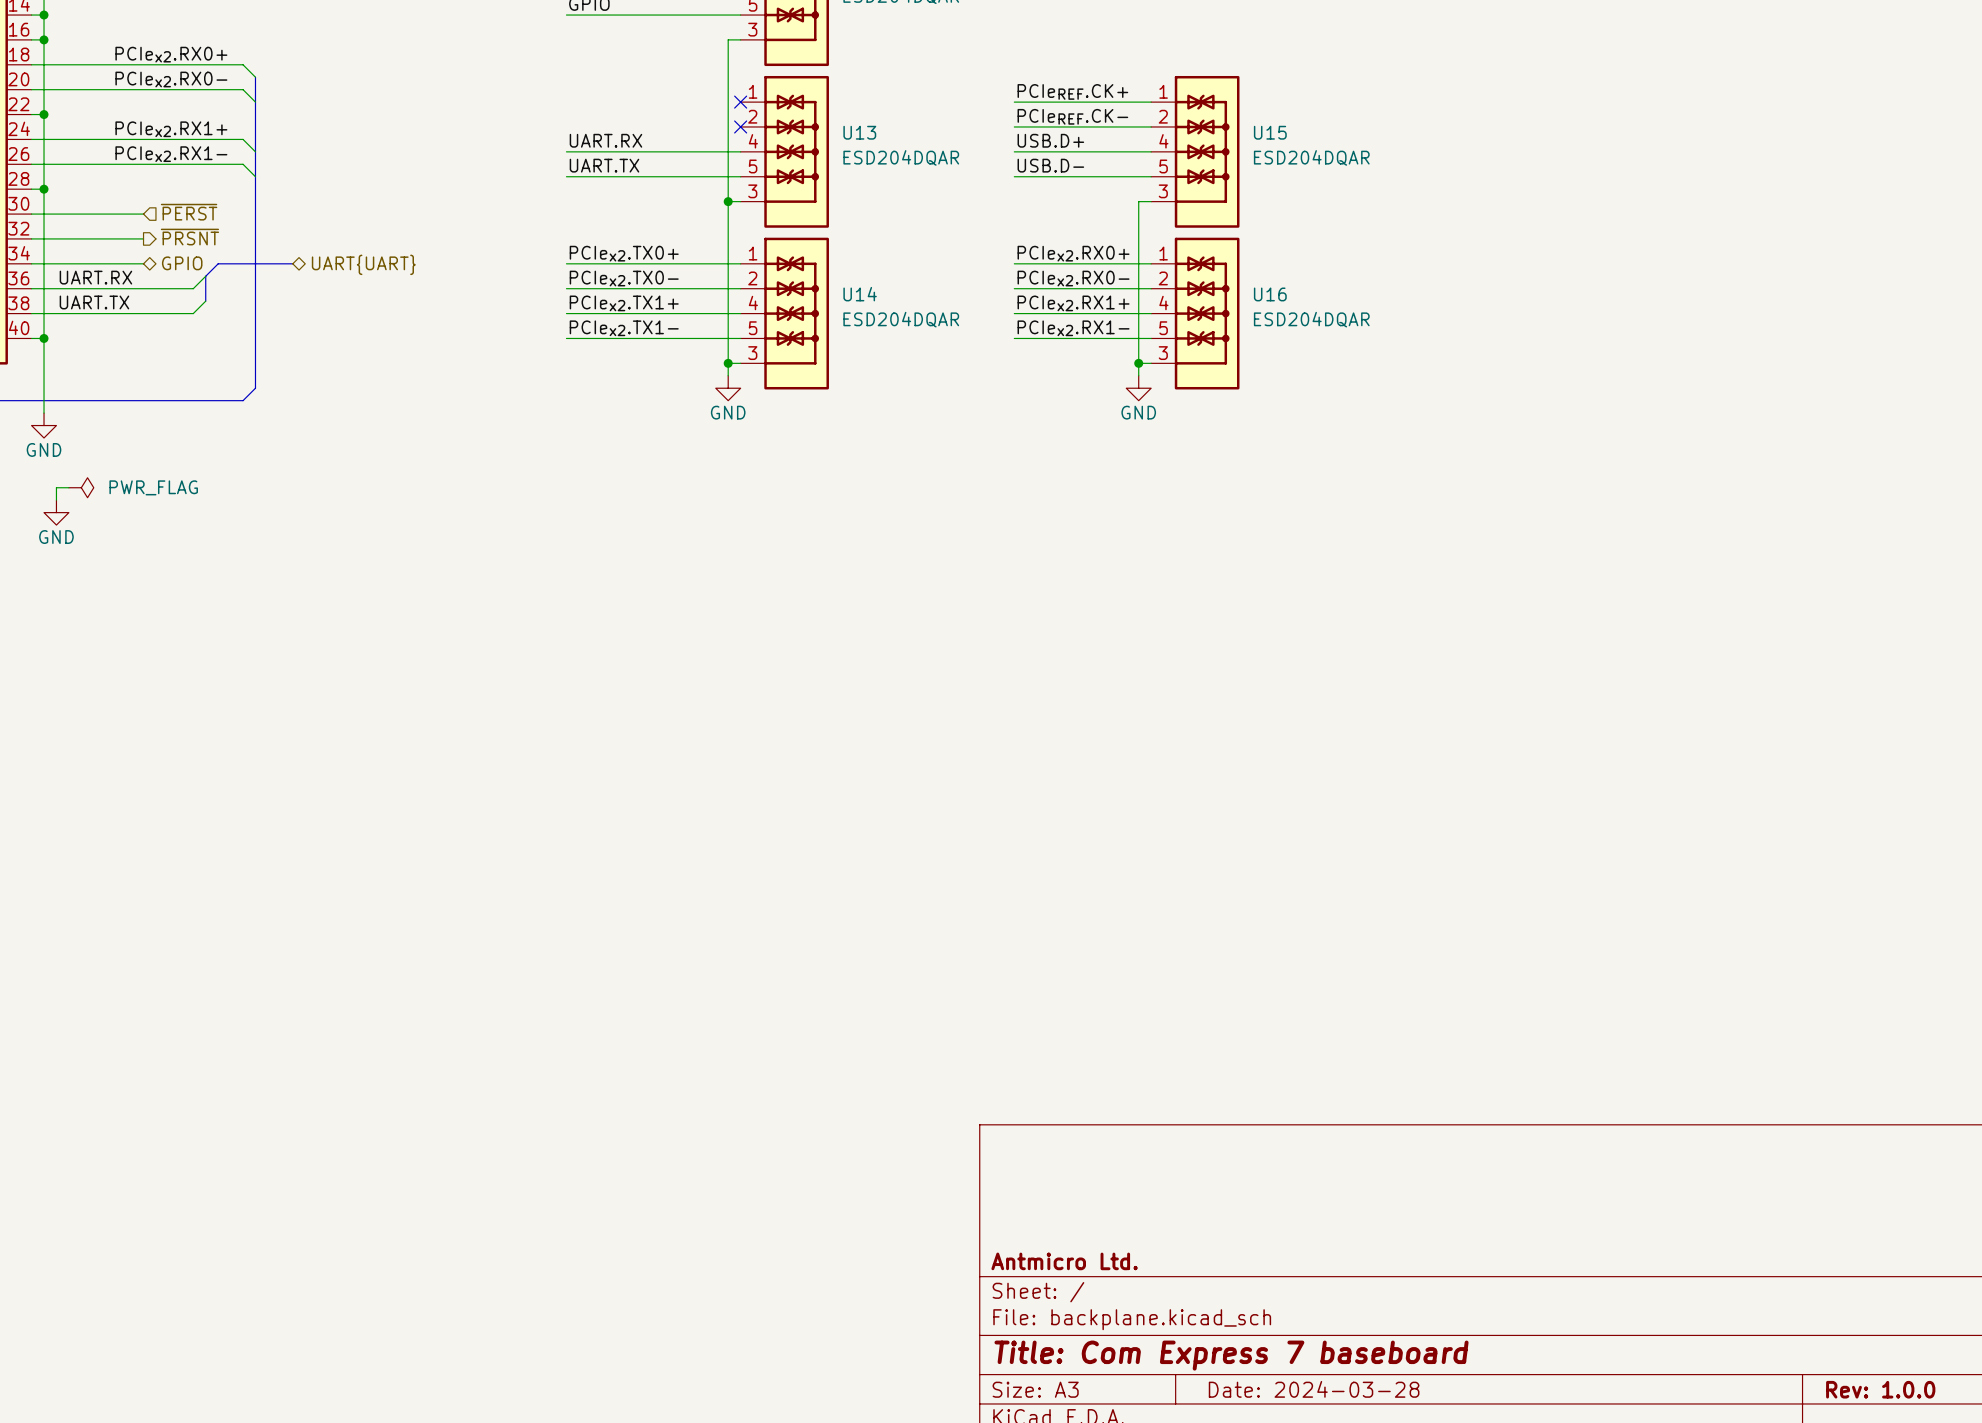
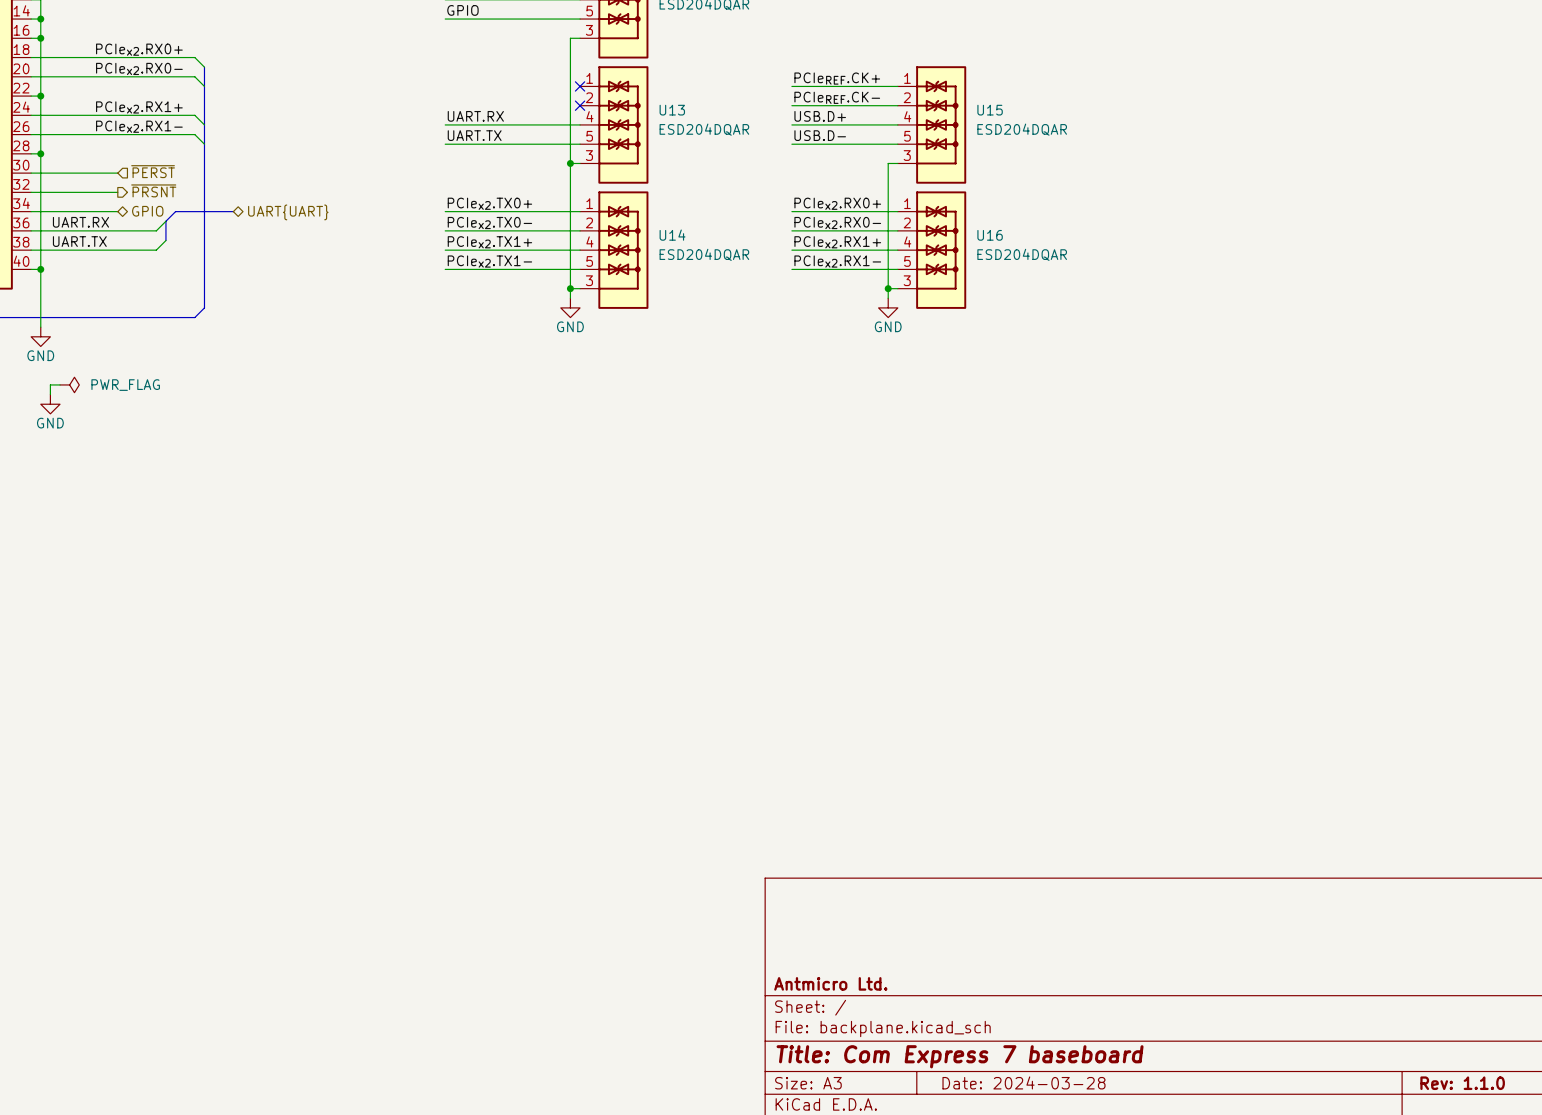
title block: Rev: 1.0.0 (1880, 1389) -> Rev: 1.1.0 (1462, 1083)

